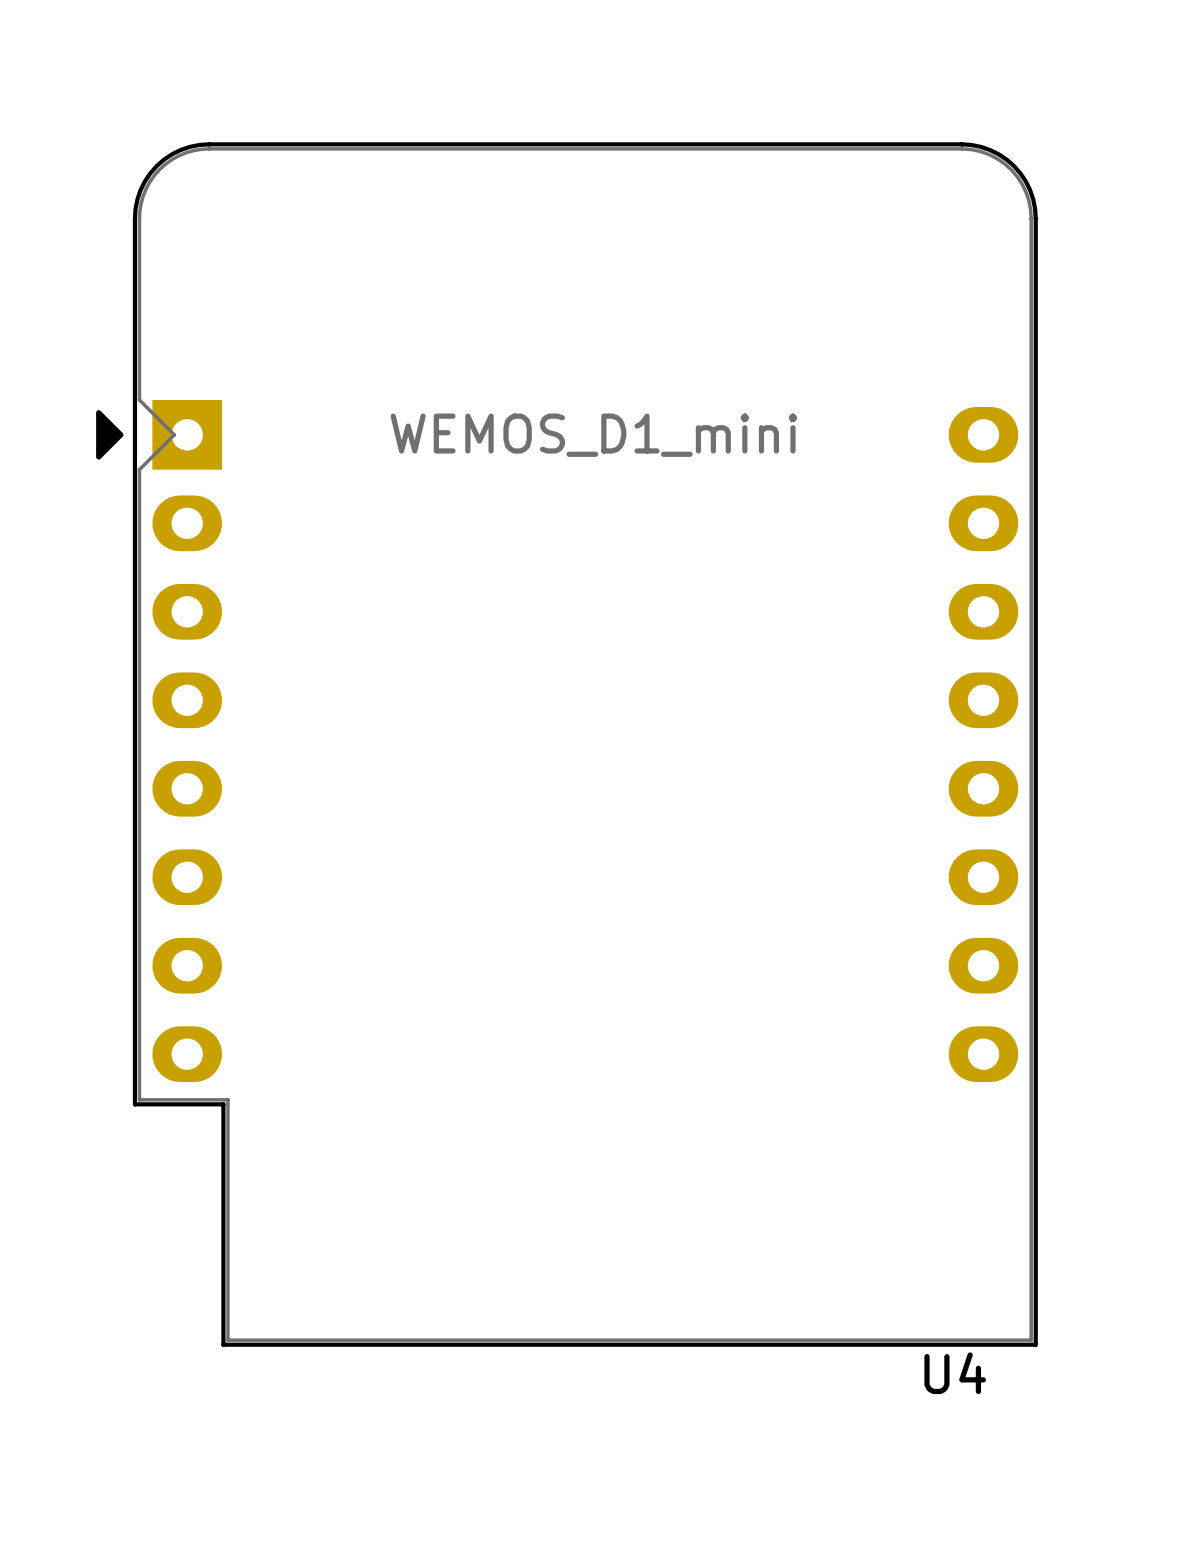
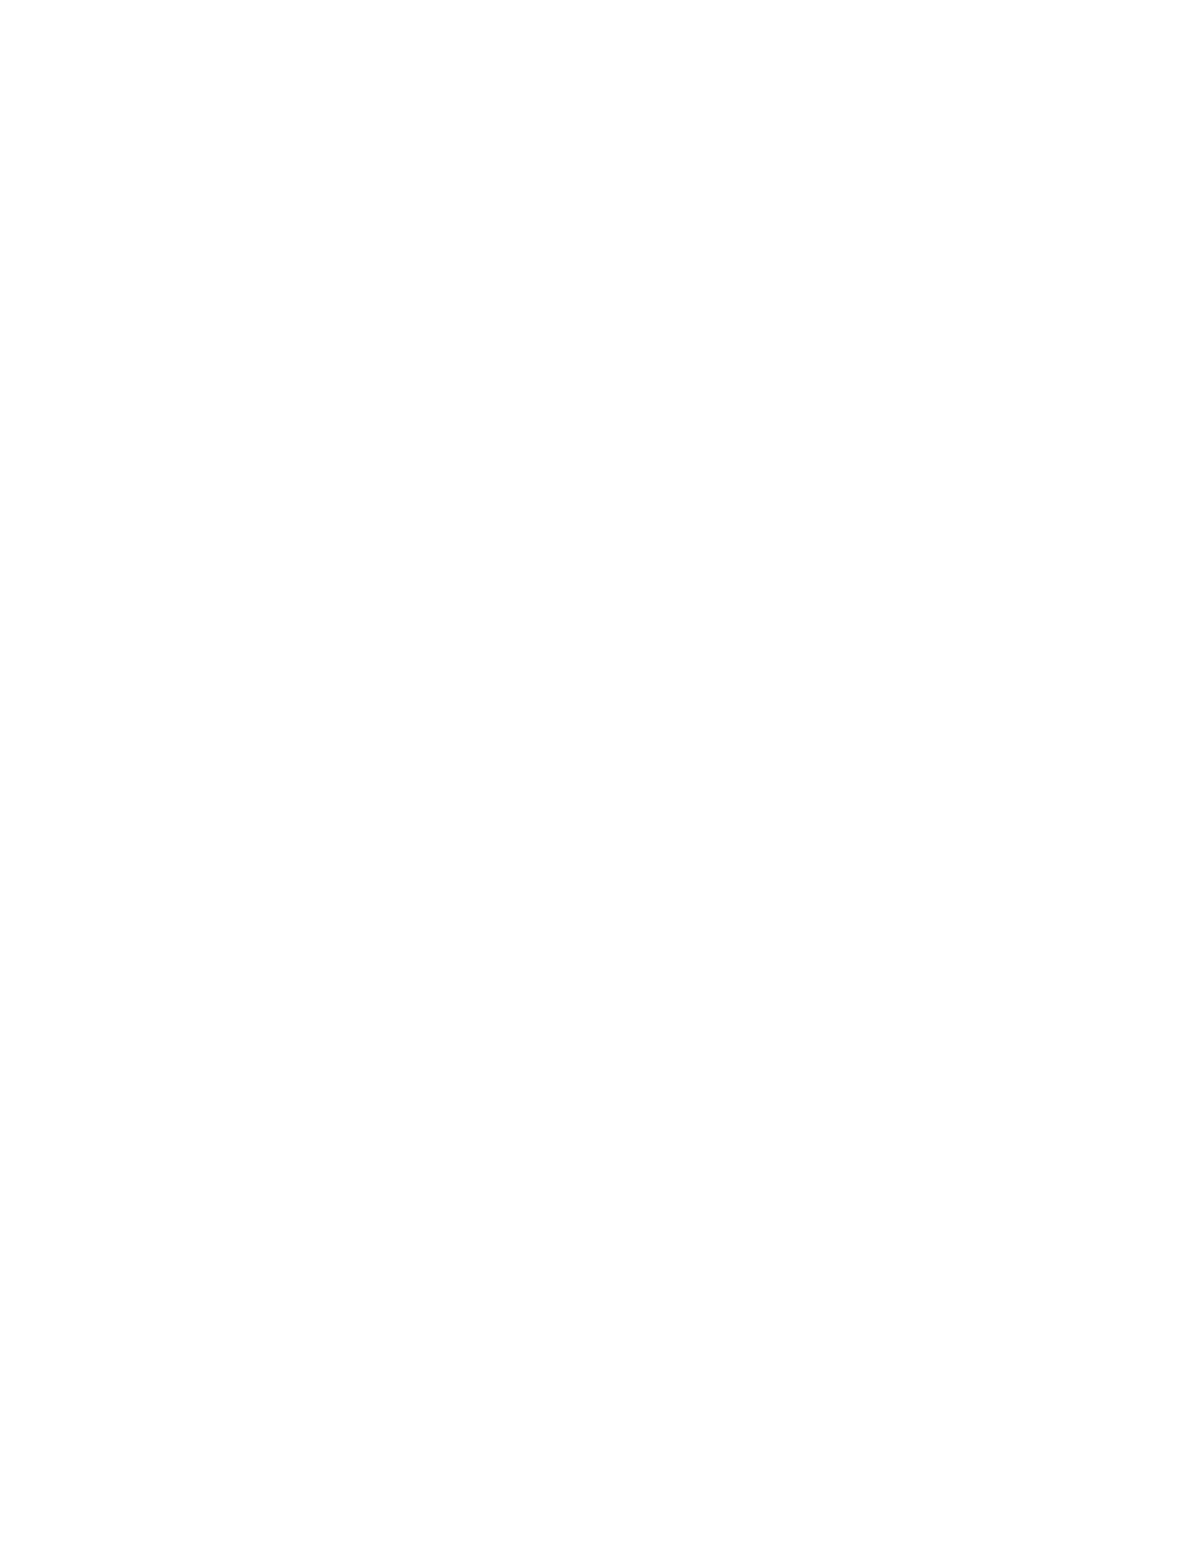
U4: WEMOS_D1_mini (566, 744) -> none

